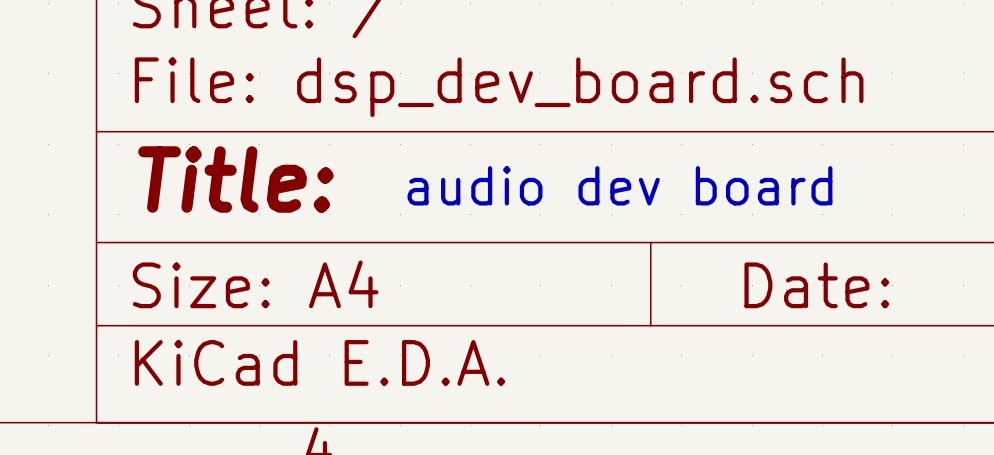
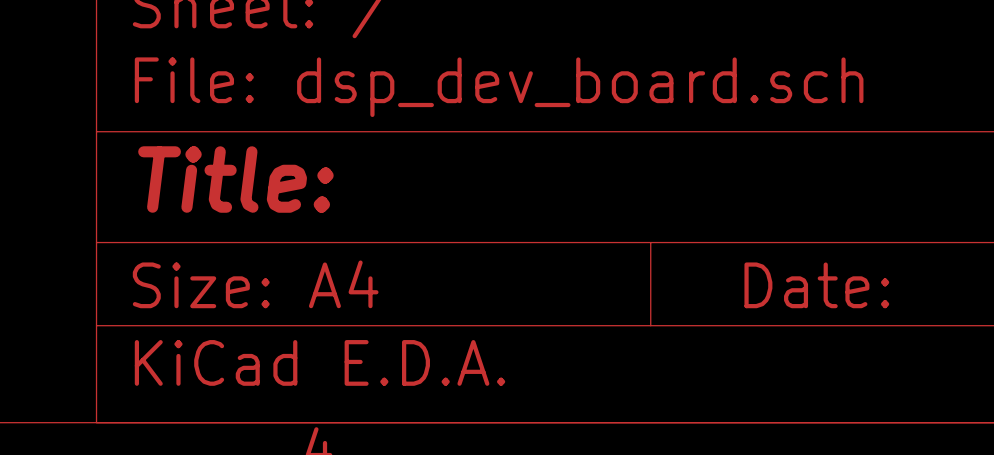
text: audio dev board (619, 185) -> none

